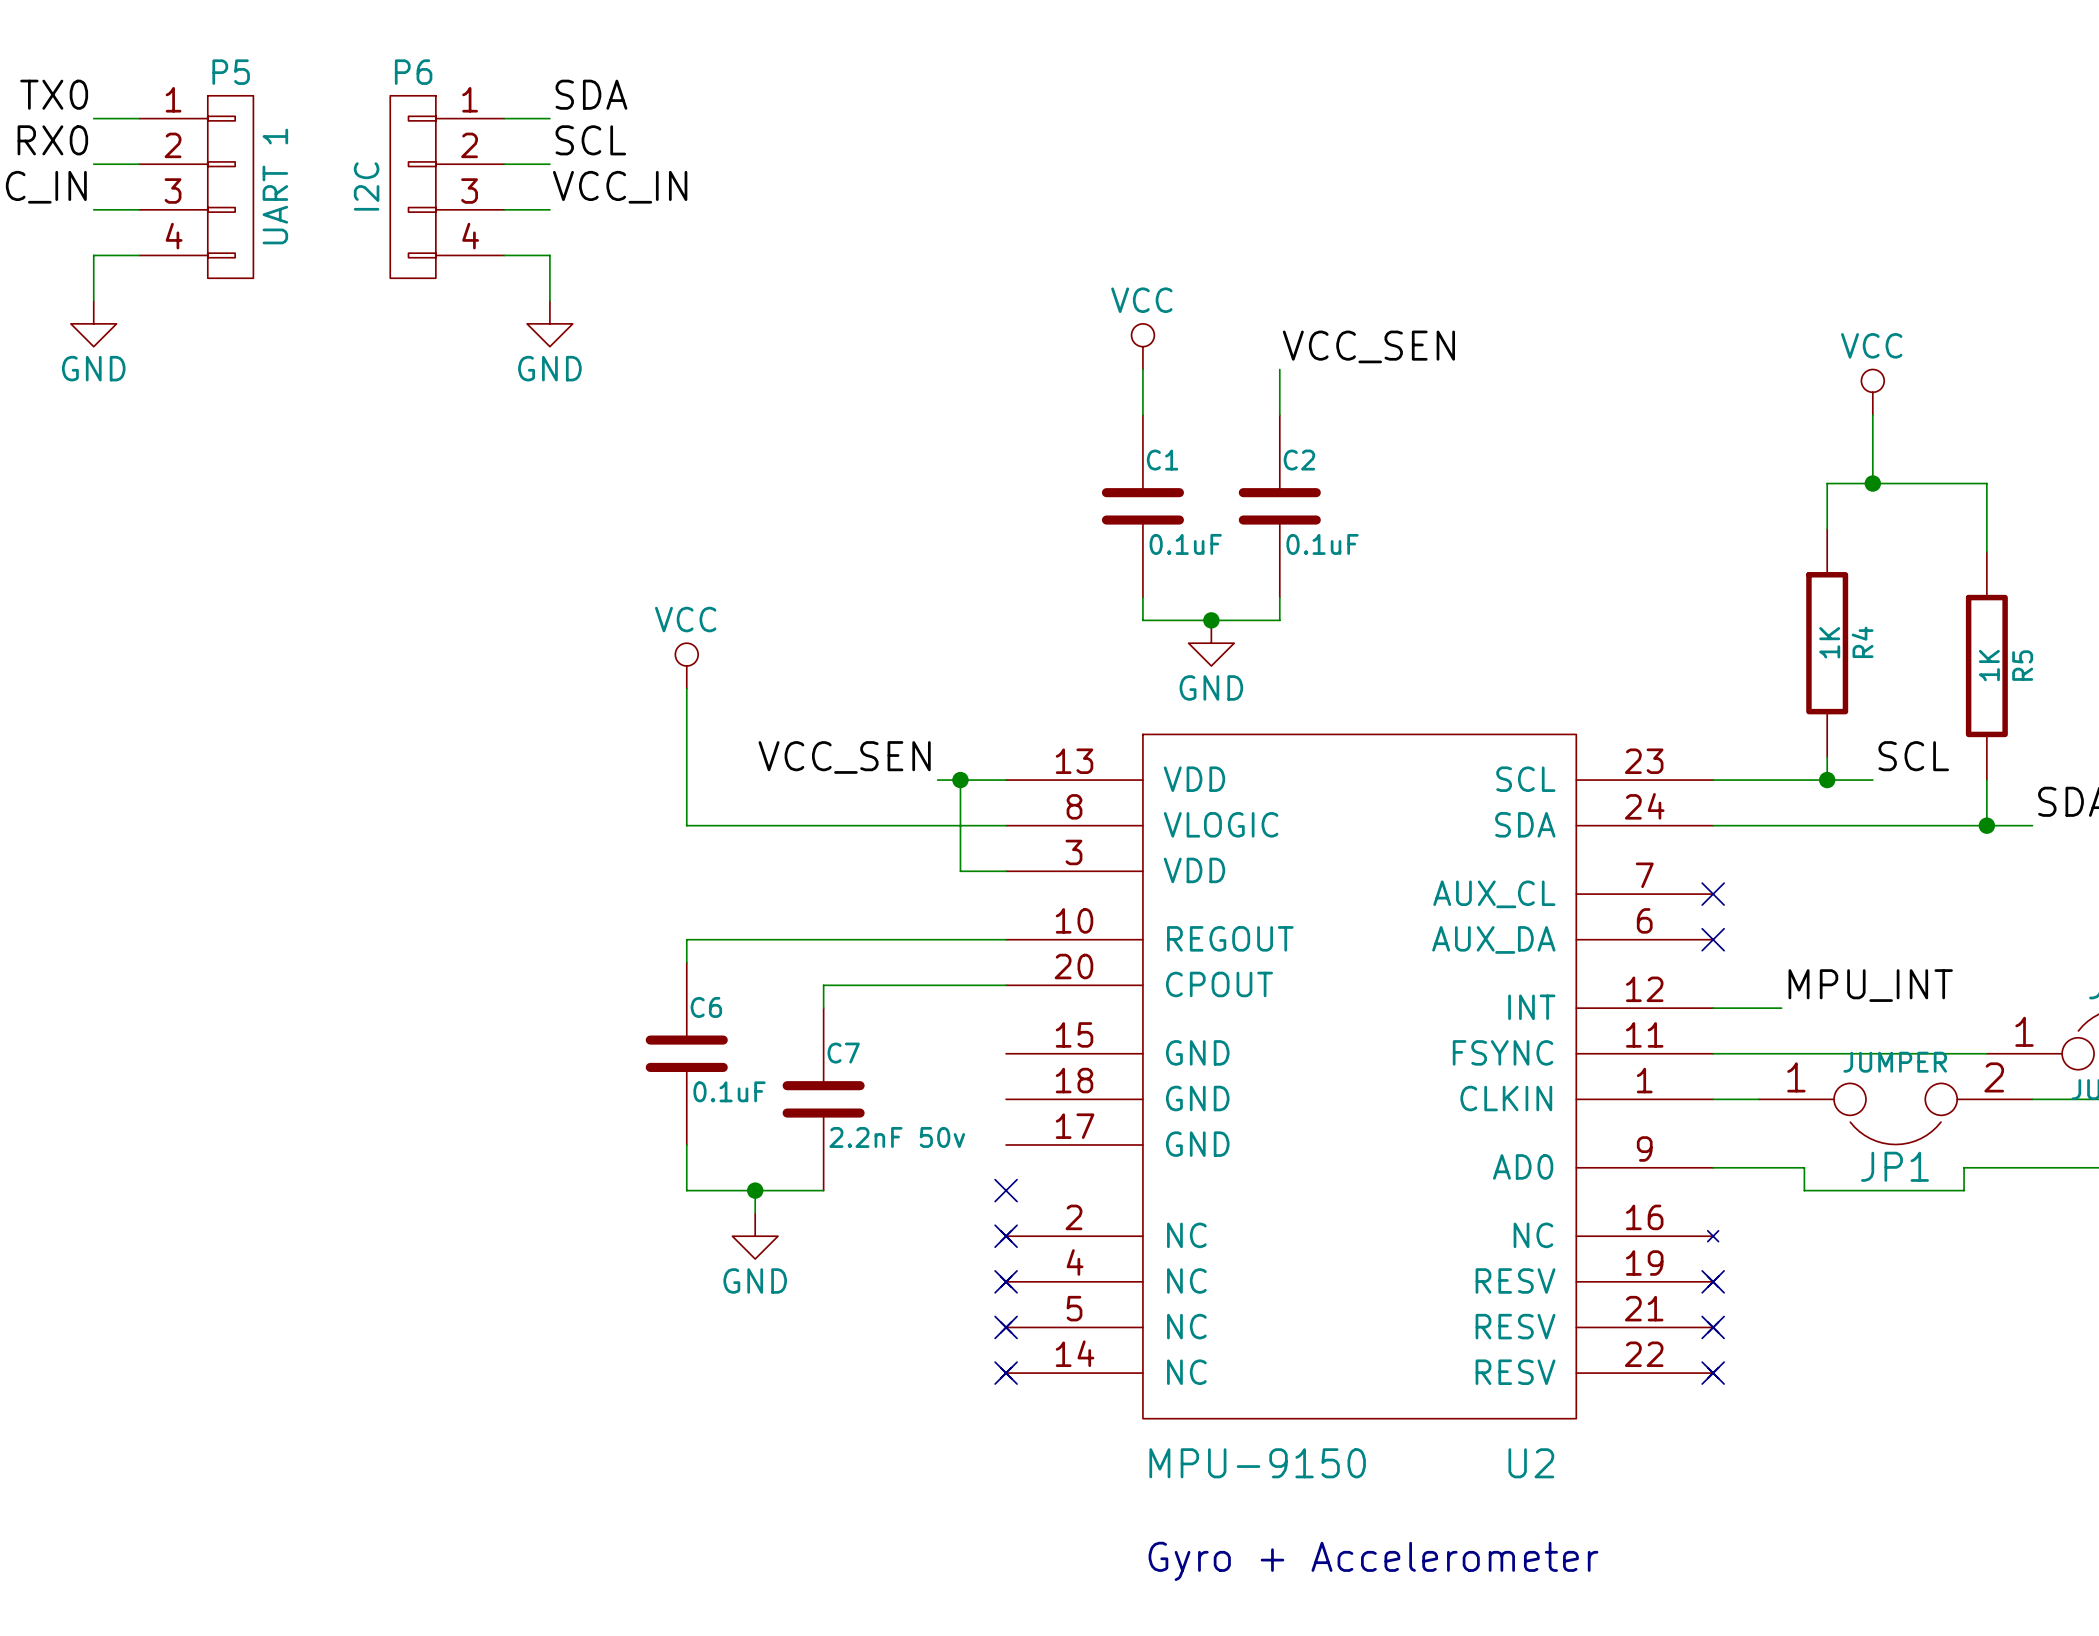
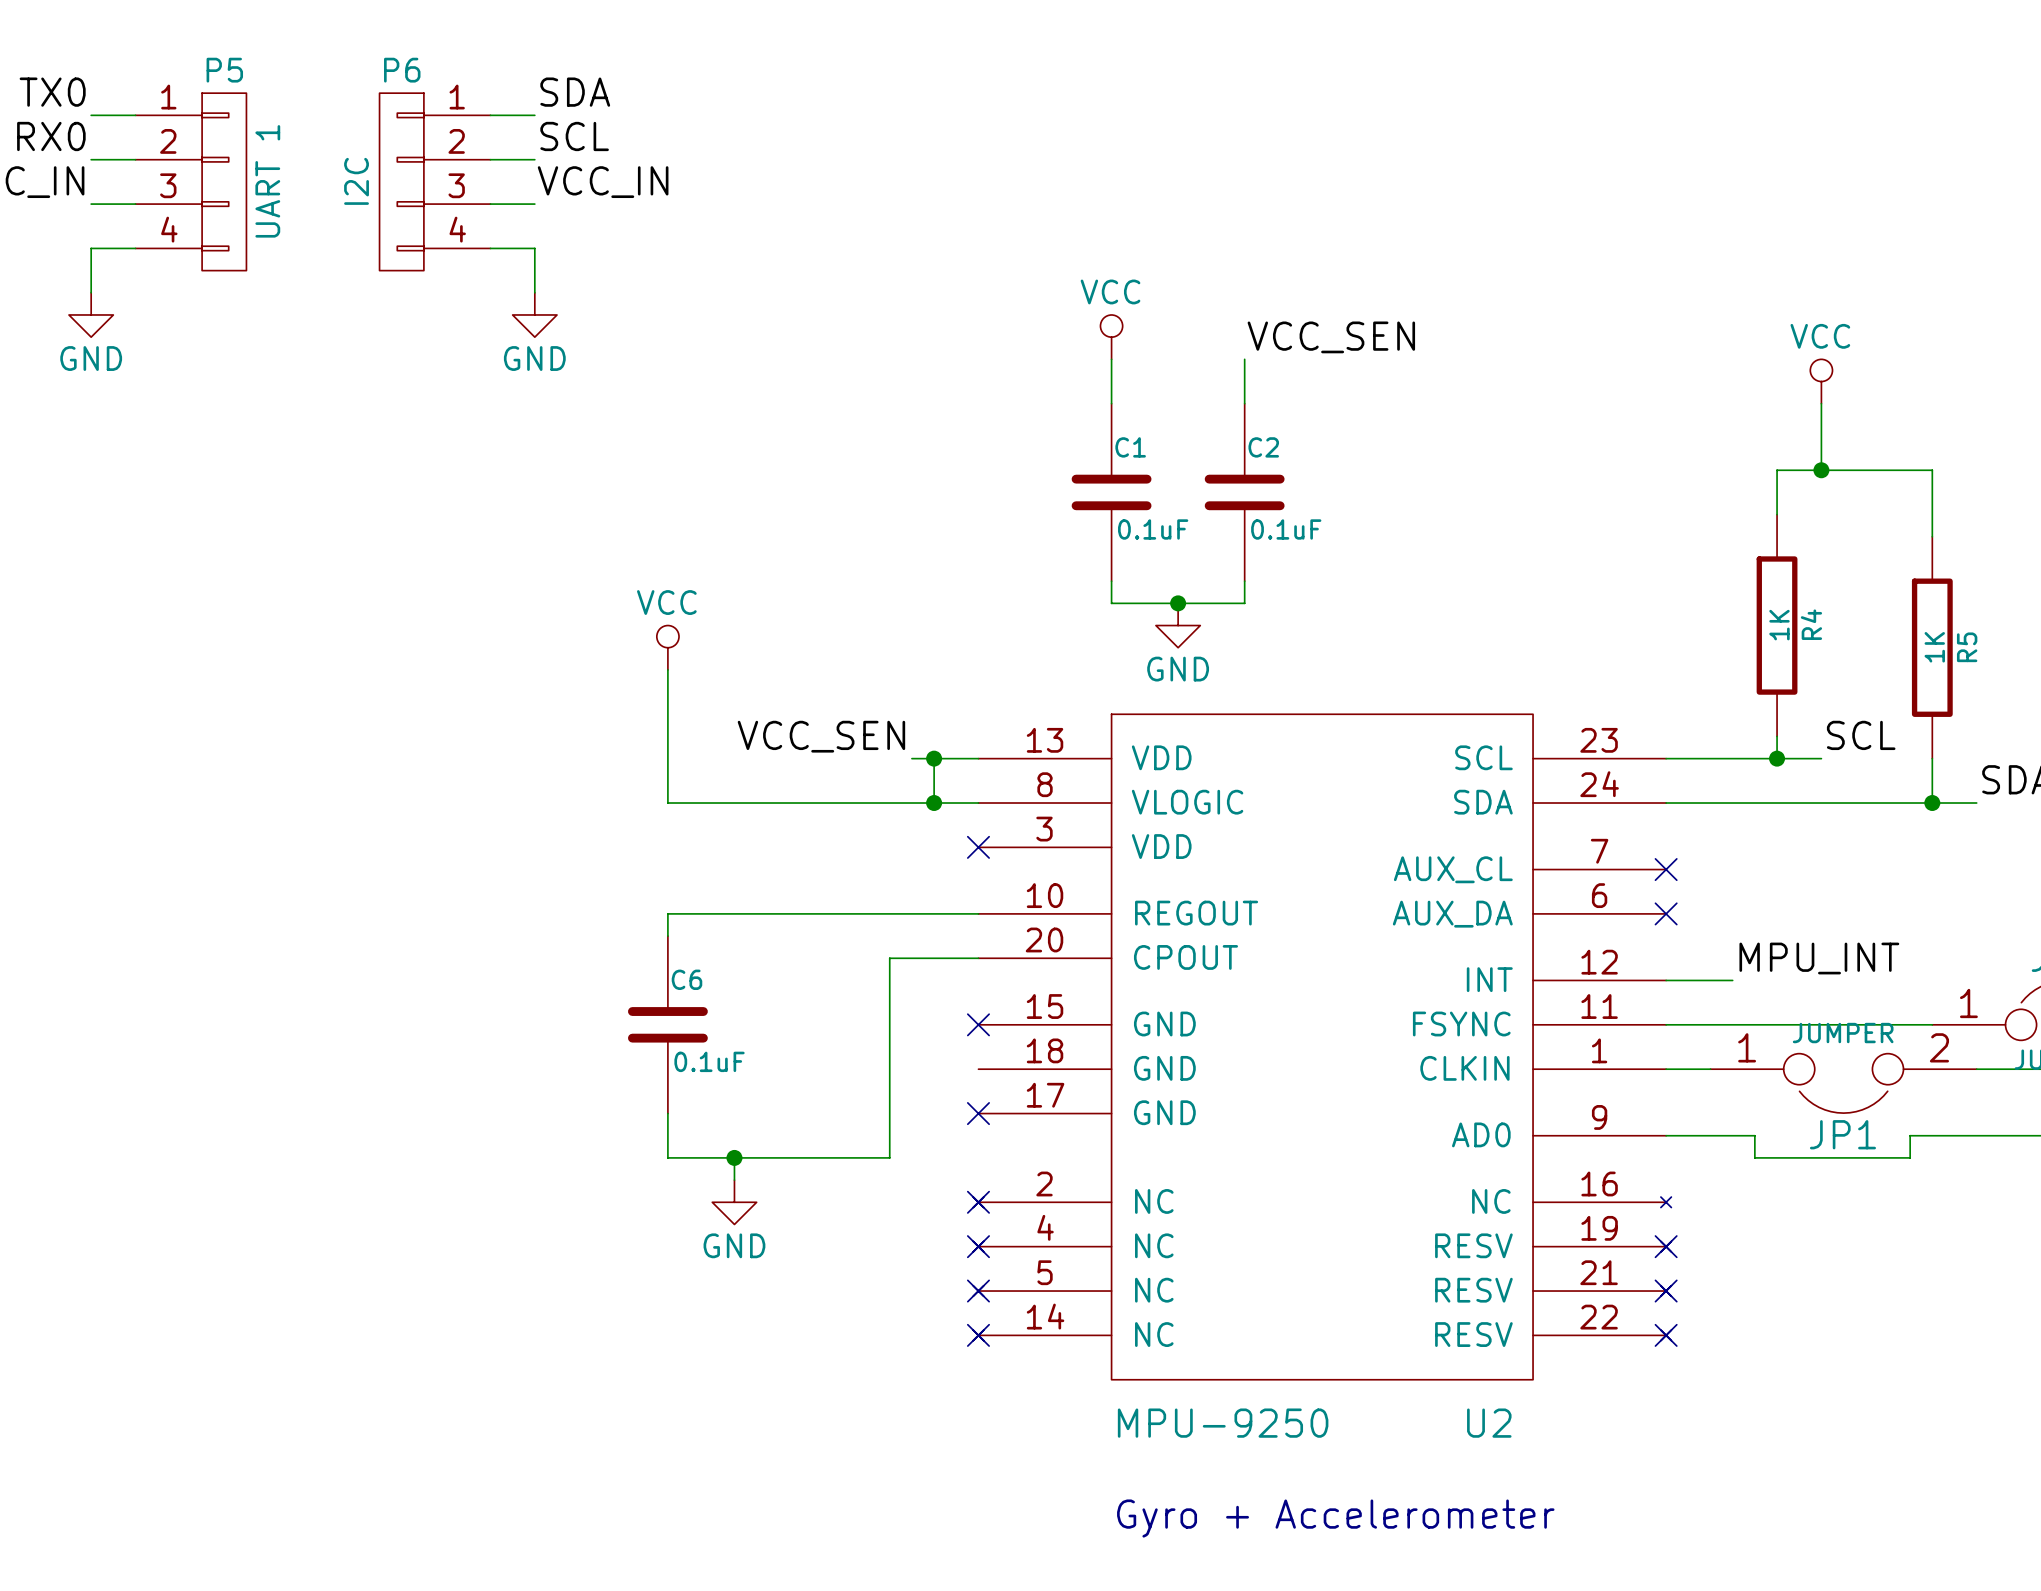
wire: (960, 825) (960, 871) (1006, 871) -> none
junction: none -> (934, 803)
no-connect mark: none -> (978, 847)
wire: (914, 985) (823, 985) (823, 1008) -> (889, 958) (889, 1157) (801, 1157)
no-connect mark: none -> (978, 1024)
C7: 2.2nF 50v (823, 1099) -> none
no-connect mark position: (1006, 1190) -> (978, 1113)
U2 value: MPU-9150 (1257, 1463) -> MPU-9250 (1223, 1423)

